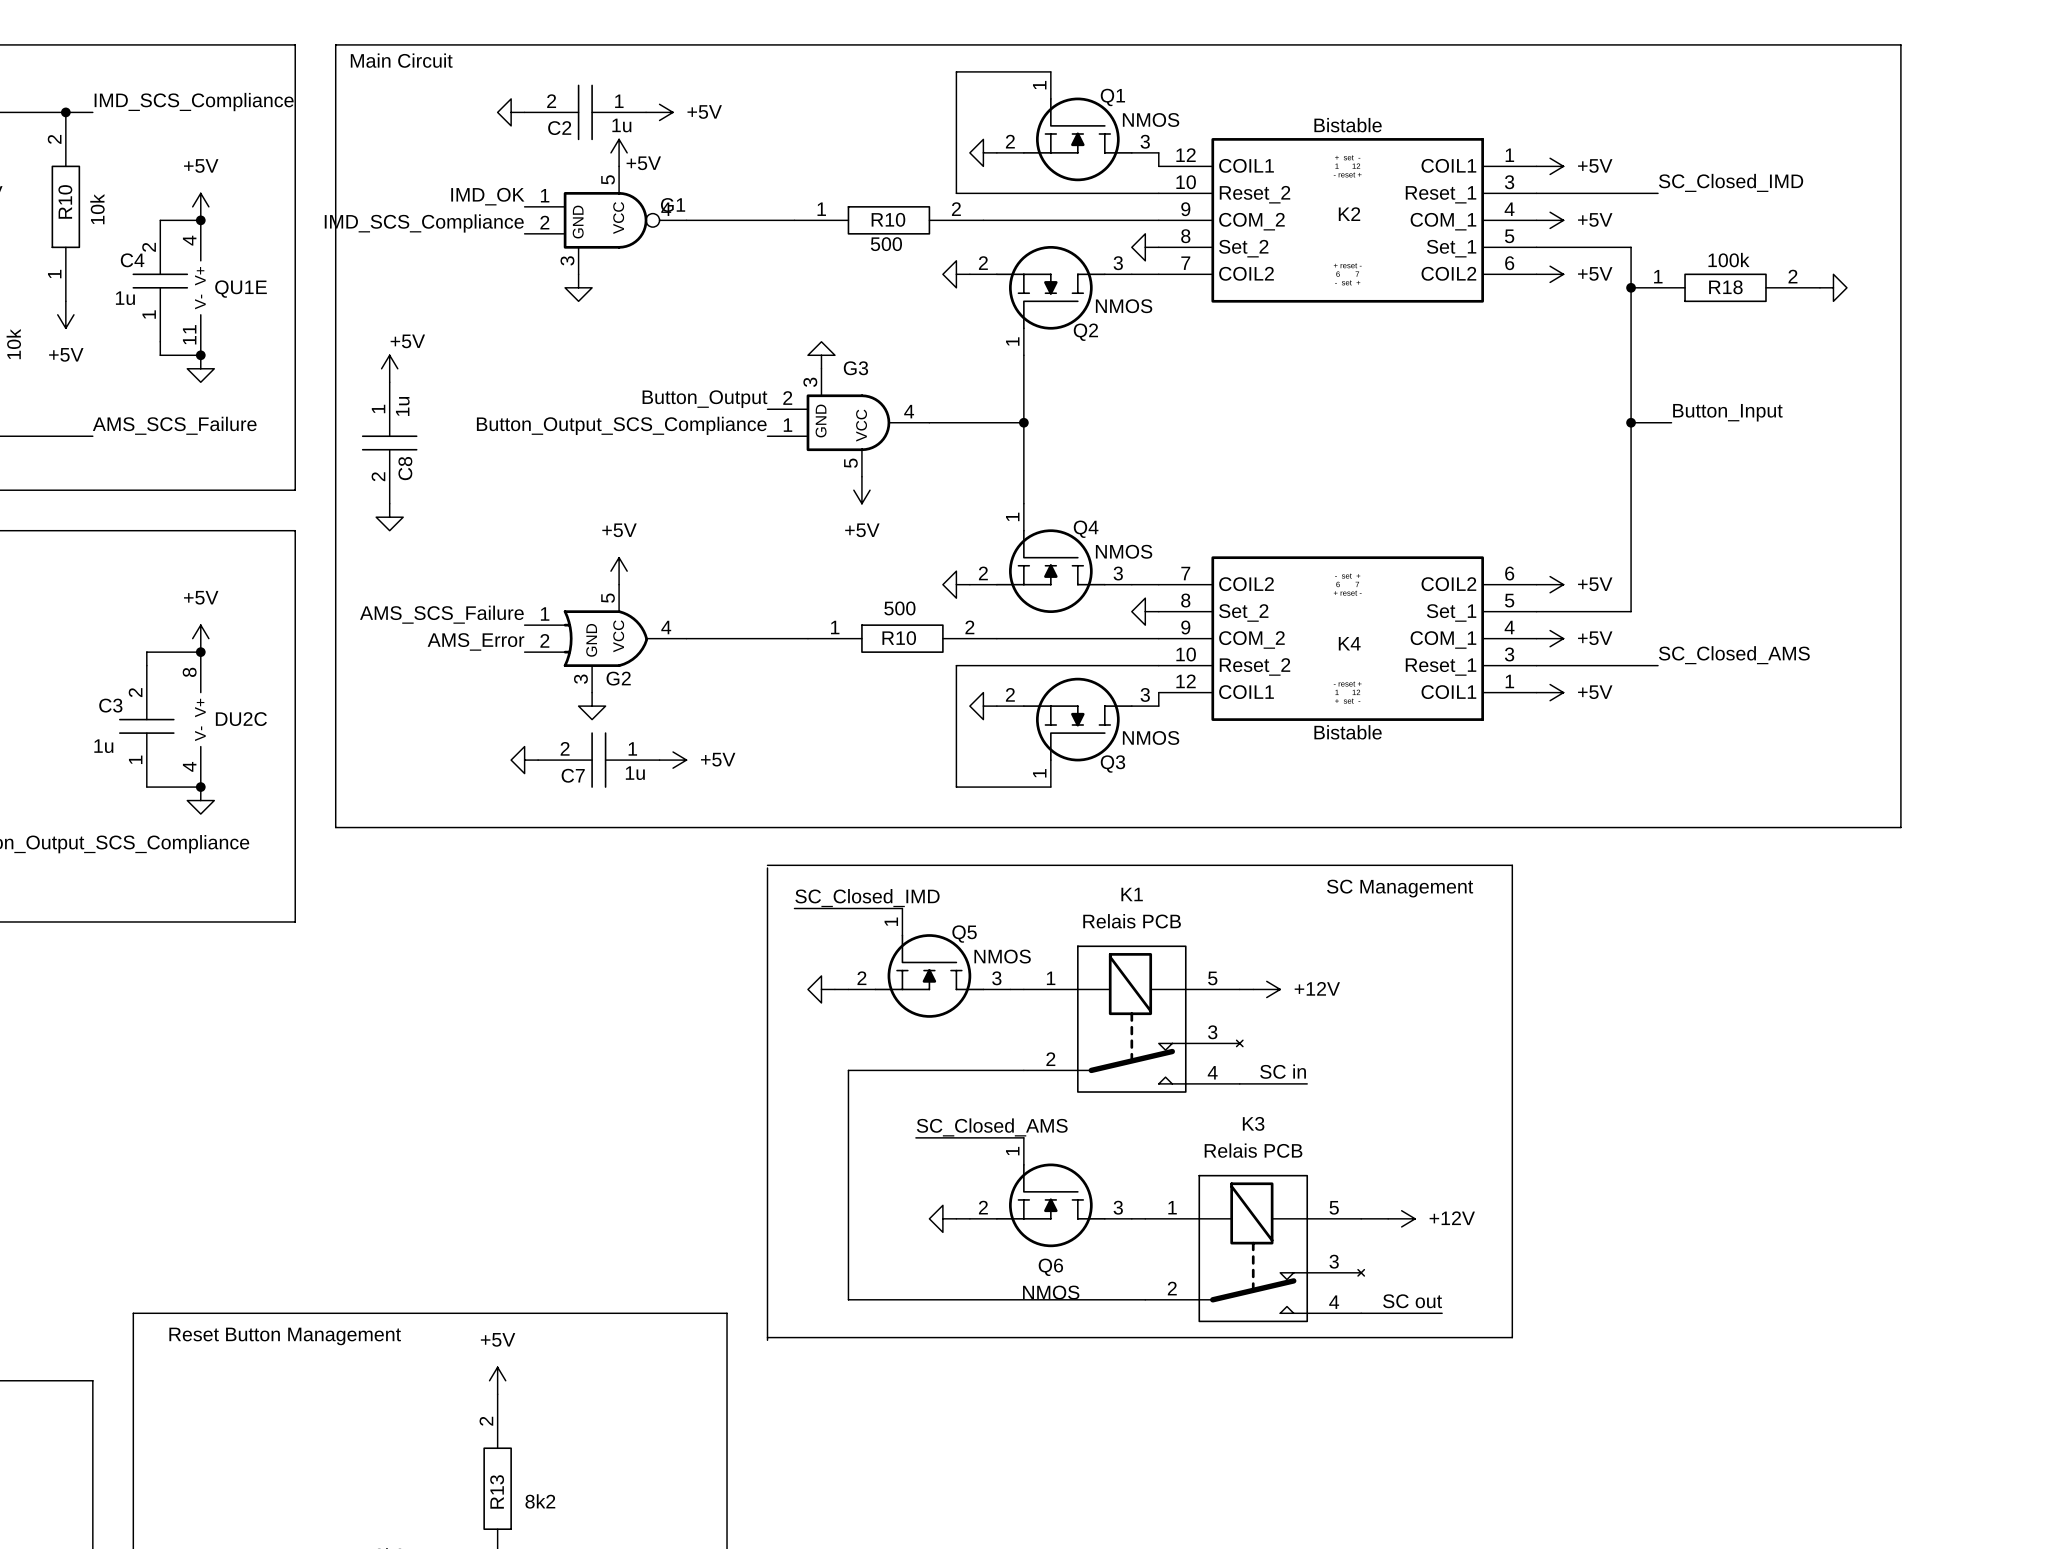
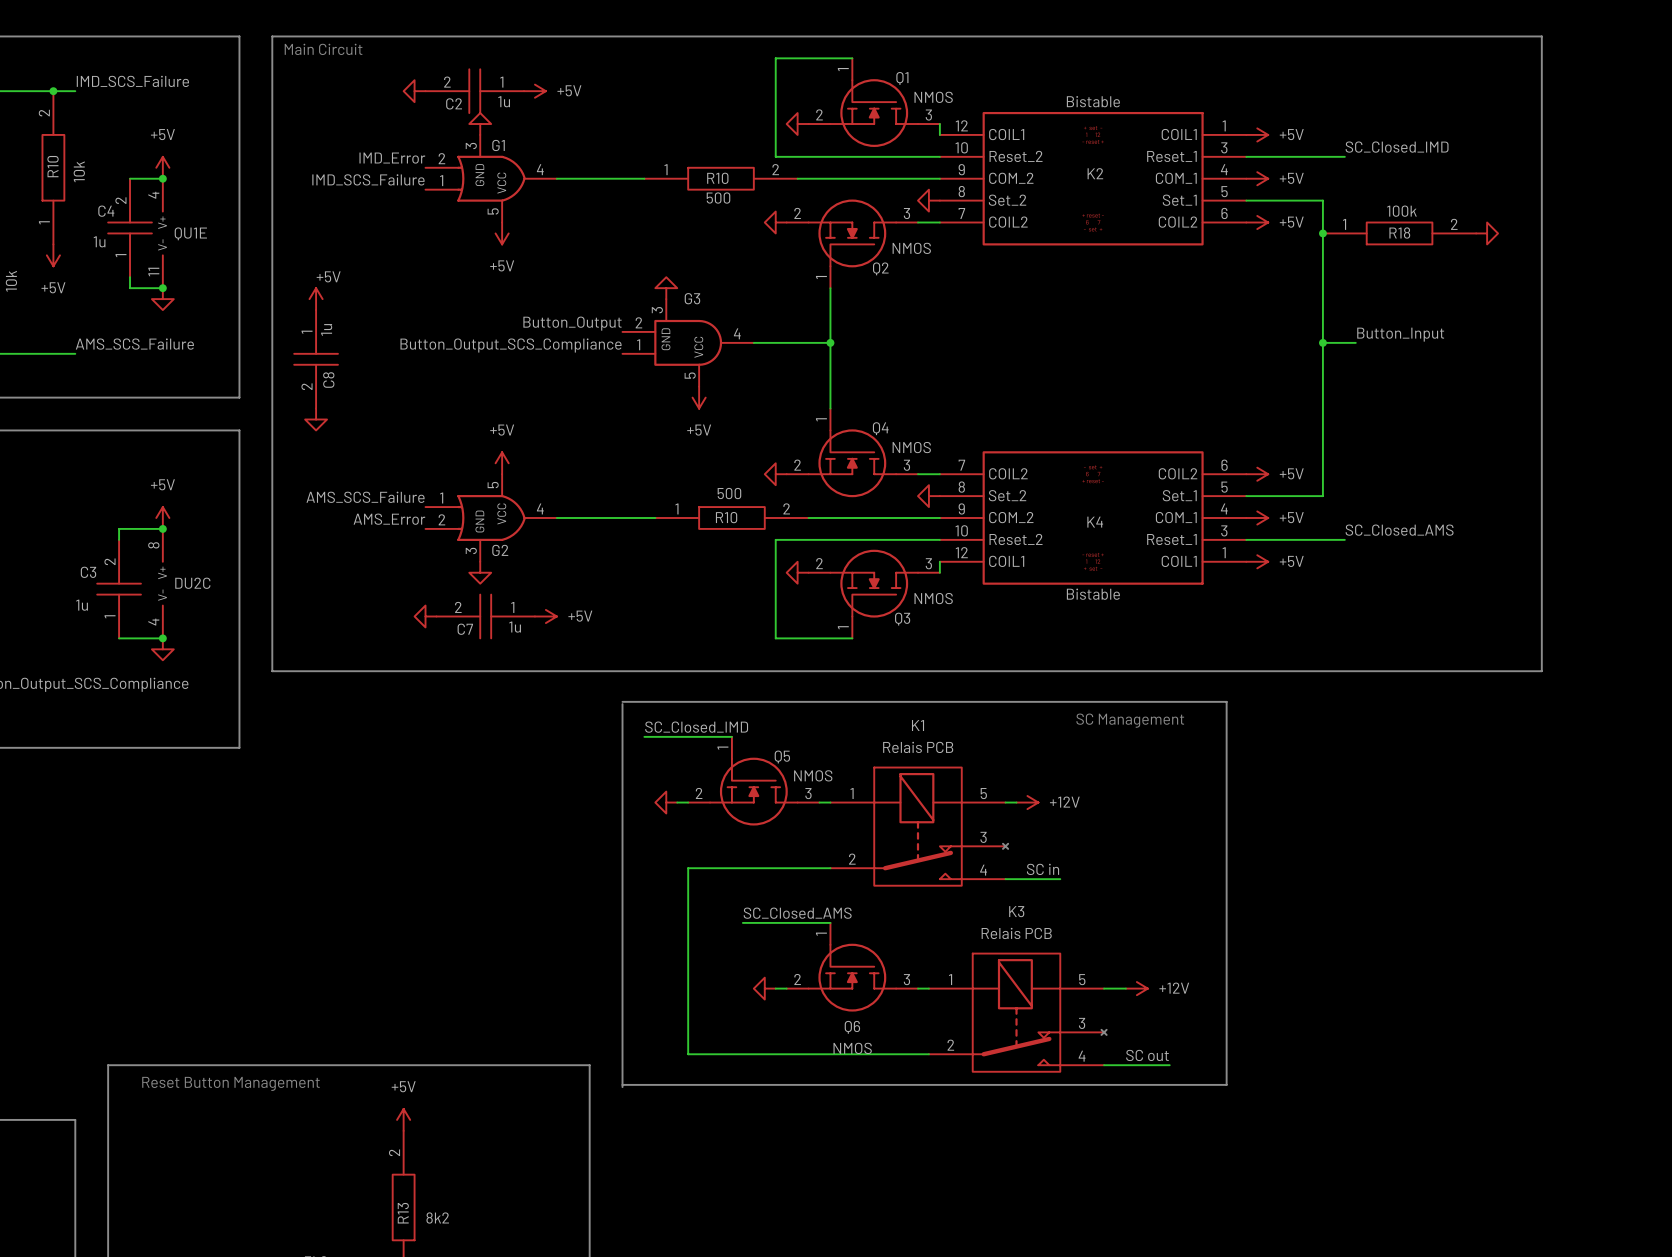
label: IMD_SCS_Compliance (194, 102) -> IMD_SCS_Failure (132, 81)
power symbol rotation: 0° (619, 152) -> 180° (502, 233)
power symbol position: +5V (619, 152) -> +5V (502, 233)
power symbol text position: +5V (643, 163) -> +5V (502, 265)
G1 symbol: [524, 166, 687, 275] -> [425, 134, 557, 223]
label: IMD_OK (487, 196) -> IMD_Error (392, 158)
G1 name position: G1 (673, 205) -> G1 (498, 145)
label: IMD_SCS_Compliance (424, 223) -> IMD_SCS_Failure (368, 179)
power symbol rotation: 0° (578, 287) -> 180° (480, 124)
power symbol position: (578, 287) -> (480, 124)

